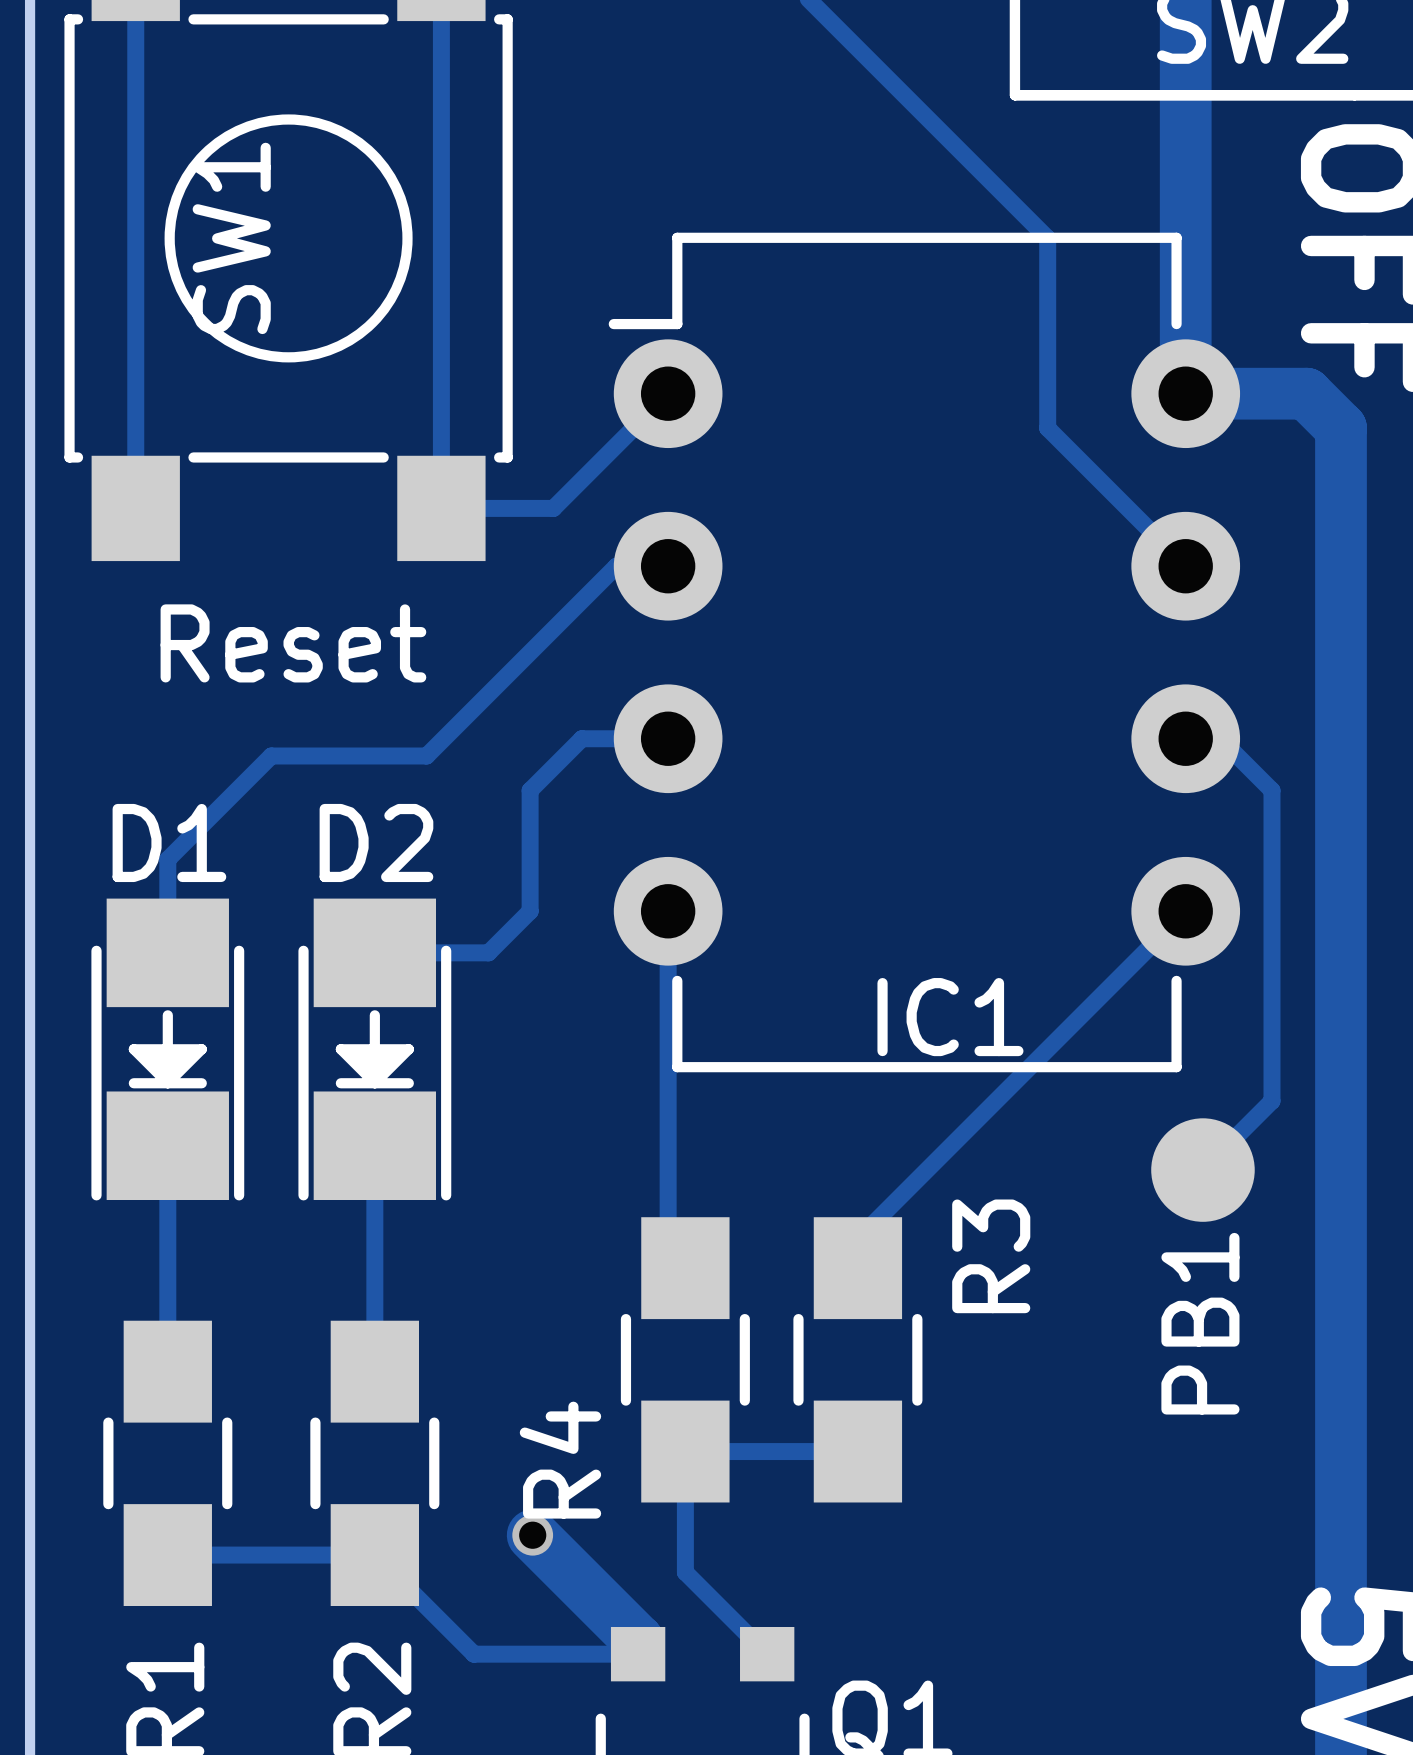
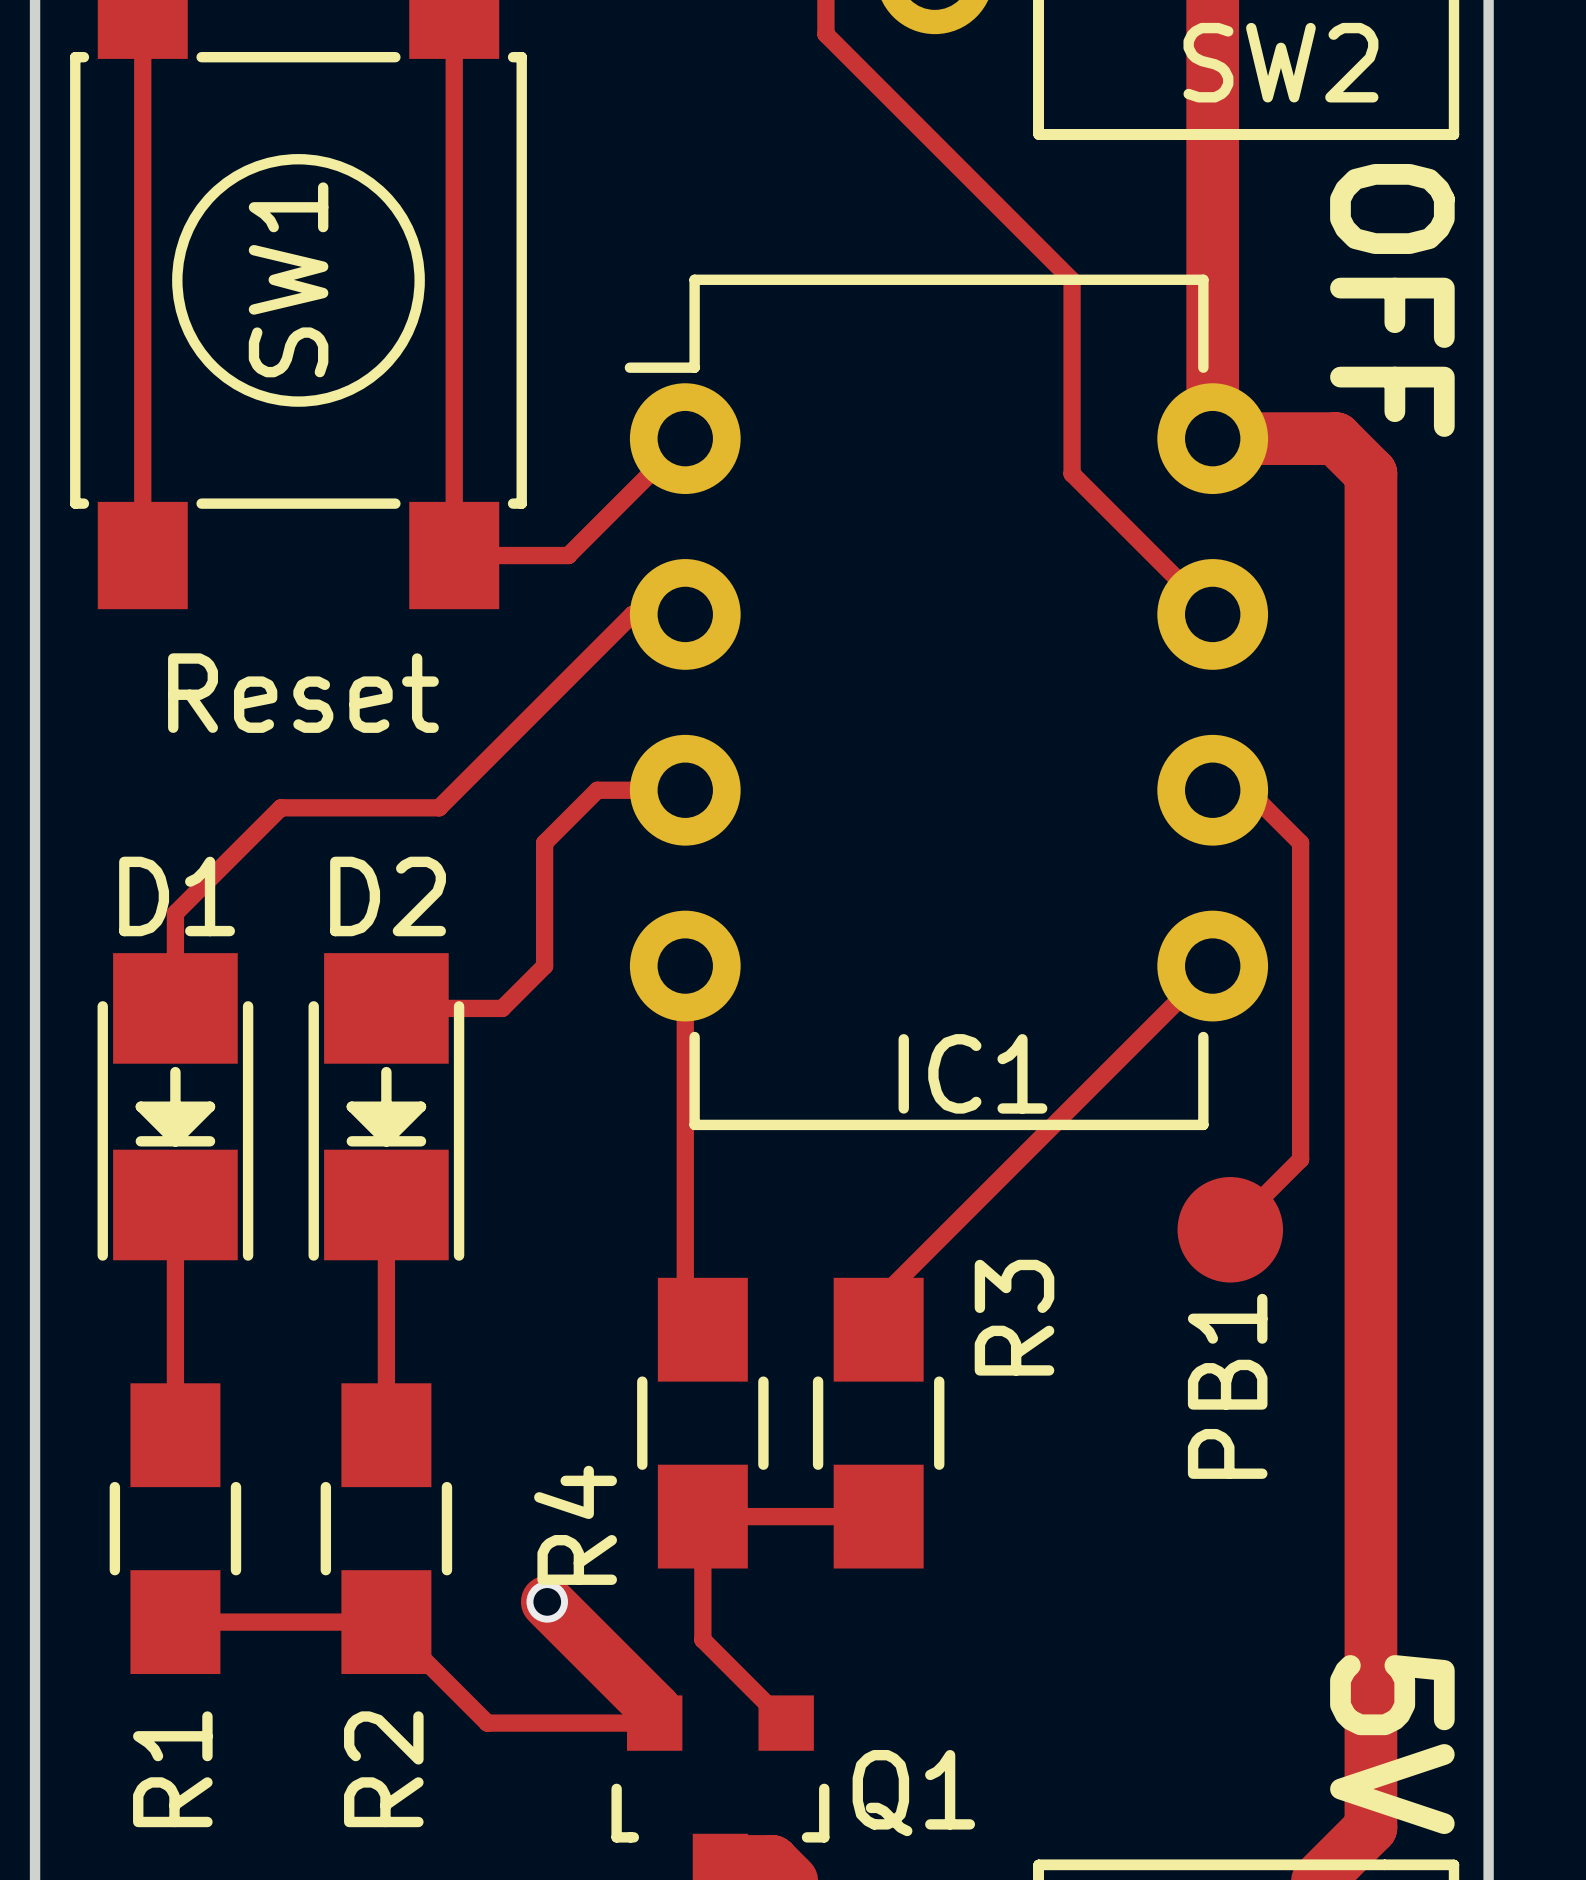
SW1 name position: SW1 (231, 238) -> SW1 (288, 279)

